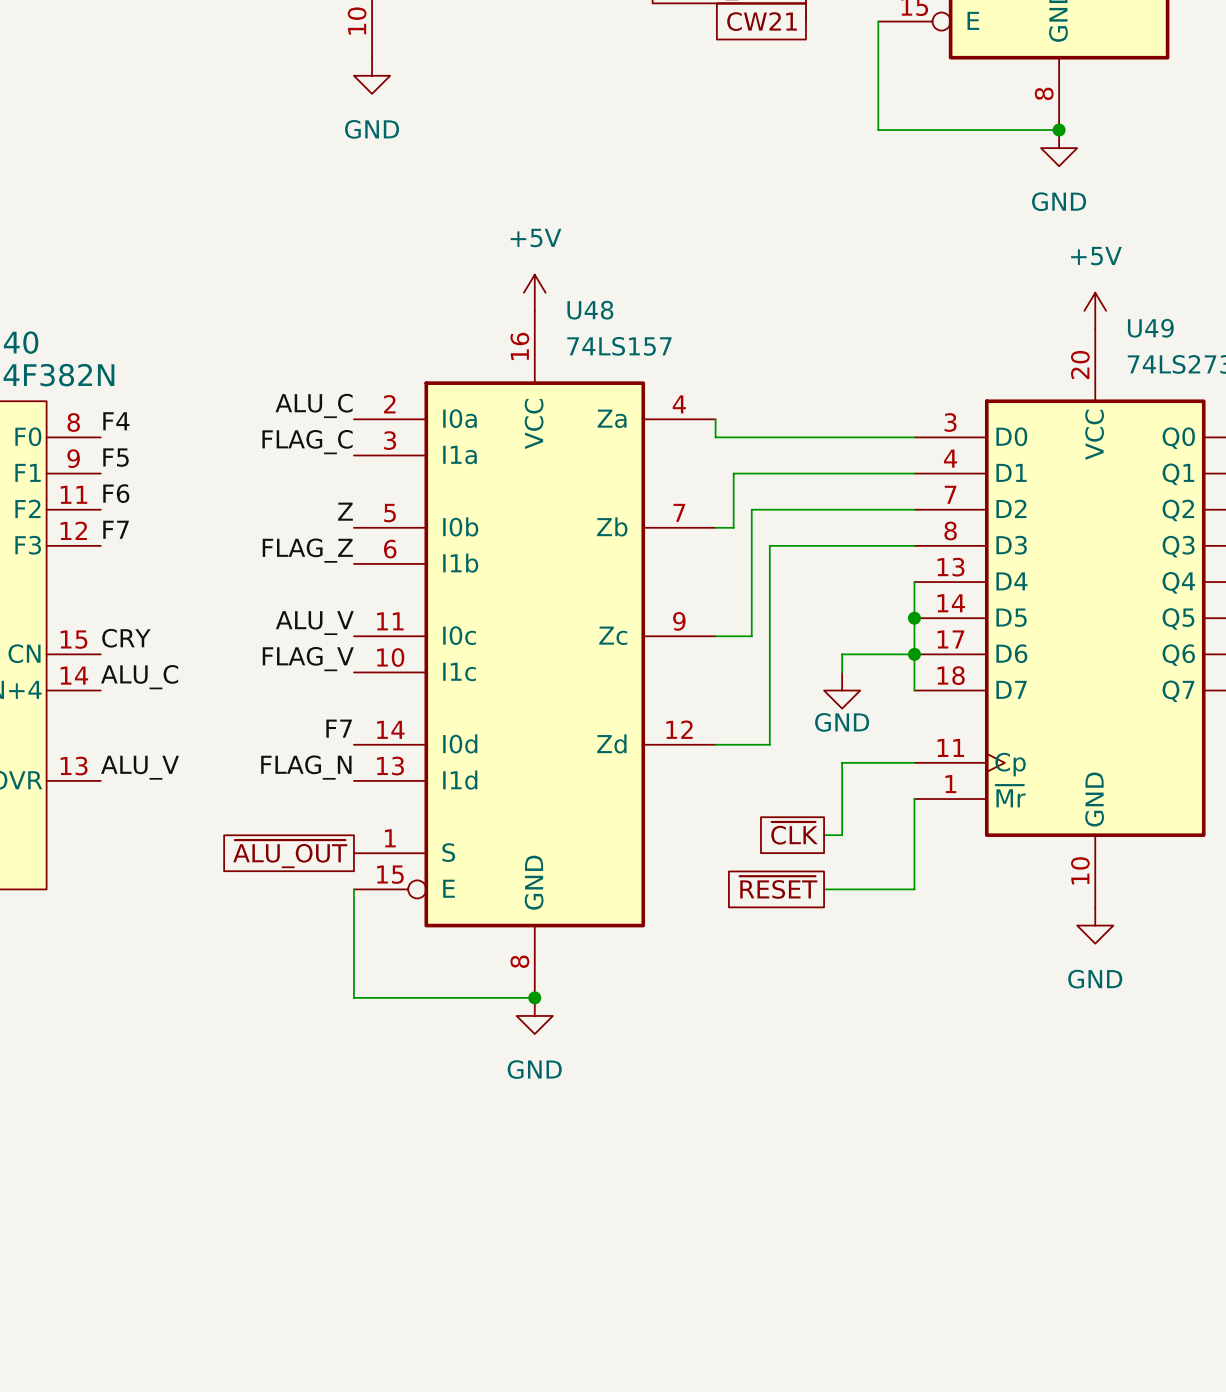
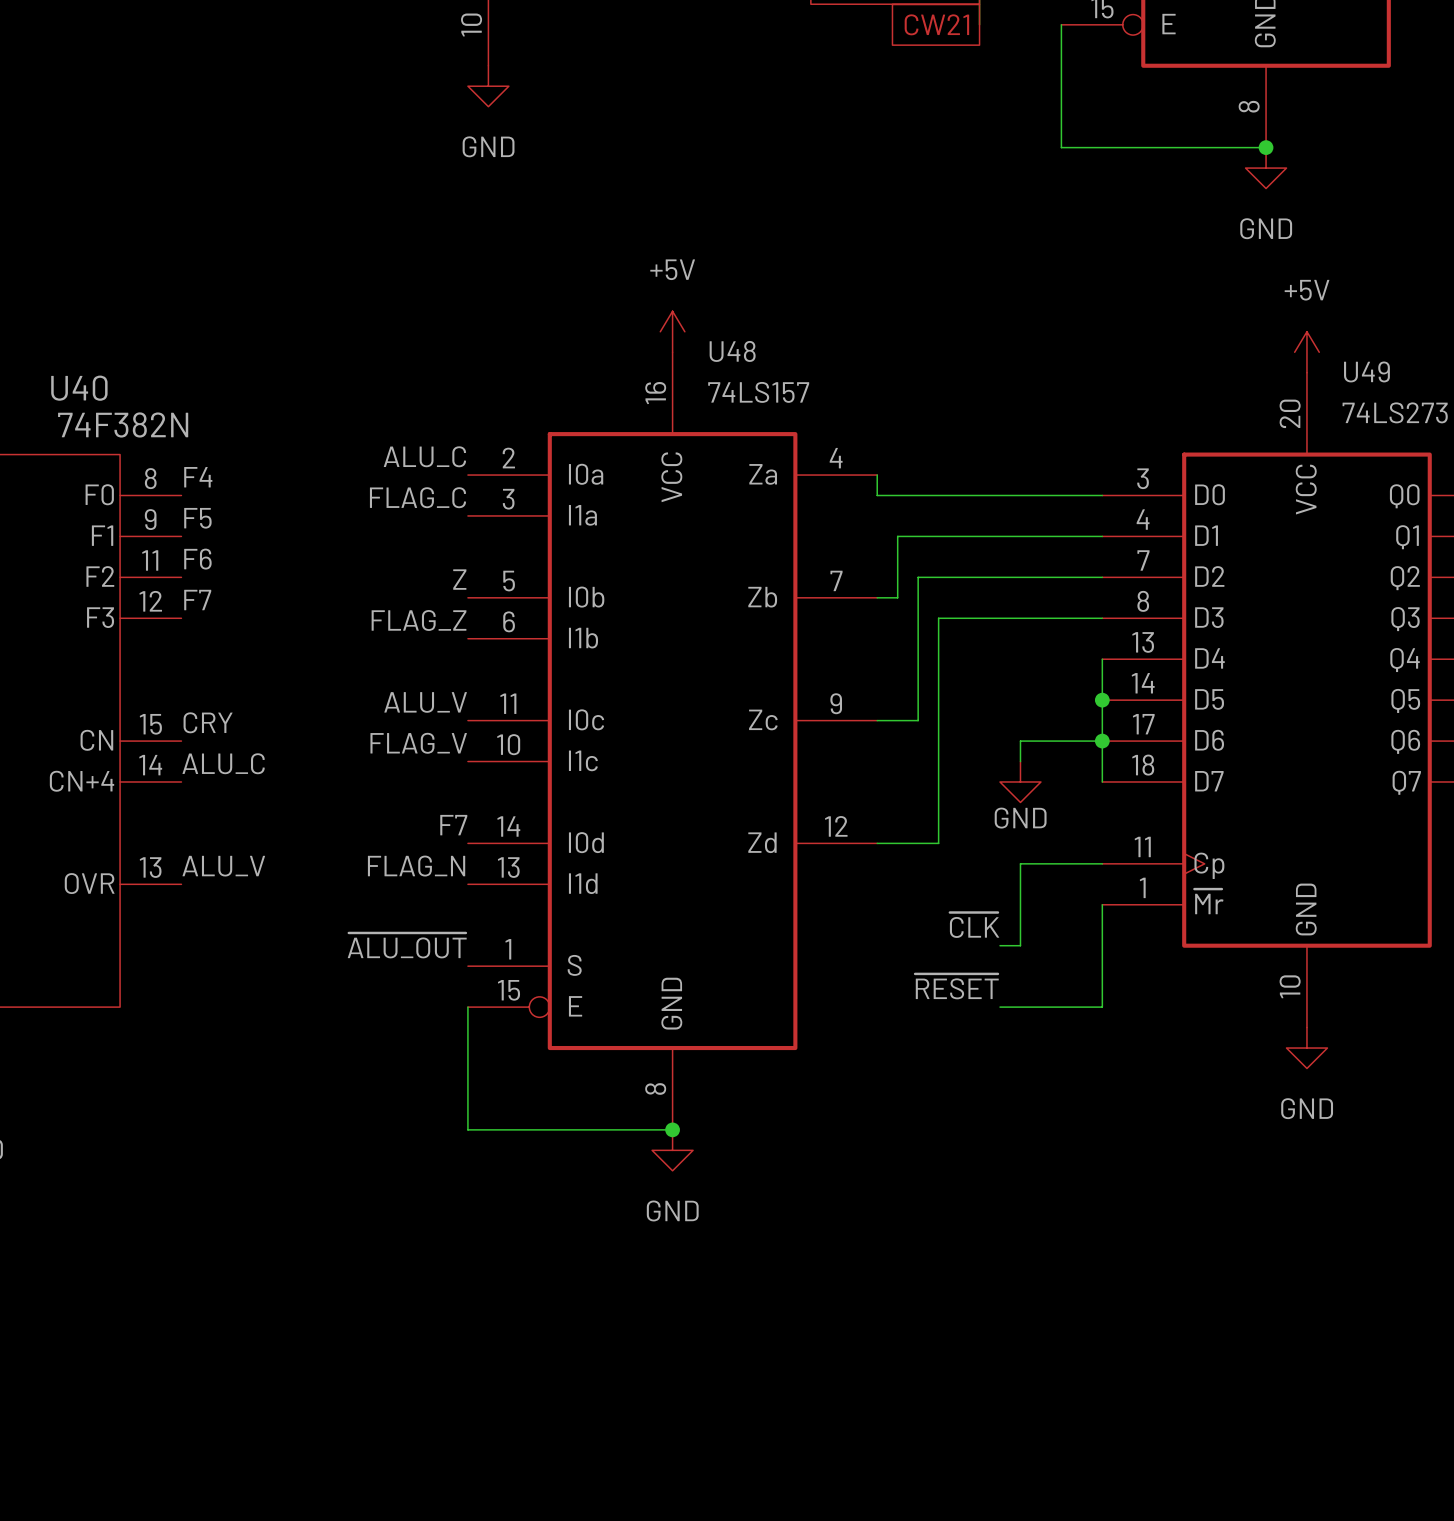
label: none -> ~{CLK} (974, 925)
global label: ~{CLK} (794, 833) -> none
label: none -> ~{ALU_OUT} (407, 945)
global label: ~{ALU_OUT} (290, 854) -> none
label: none -> ~{RESET} (956, 986)
global label: ~{RESET} (778, 887) -> none

